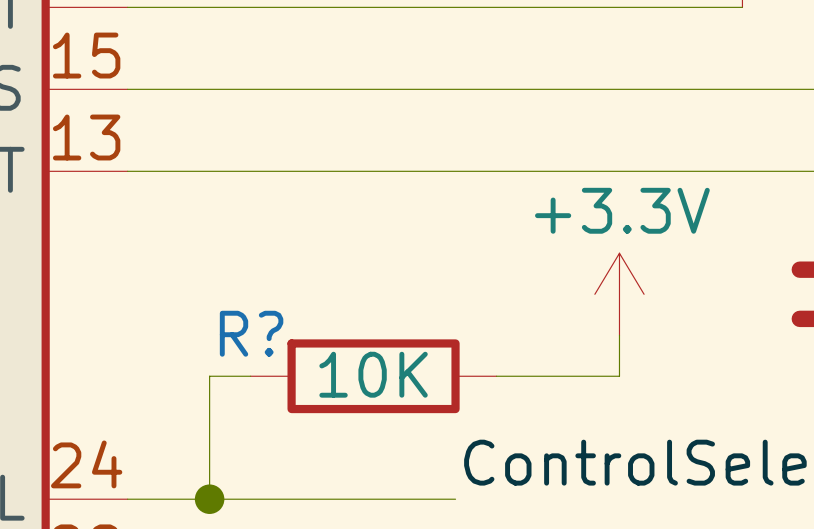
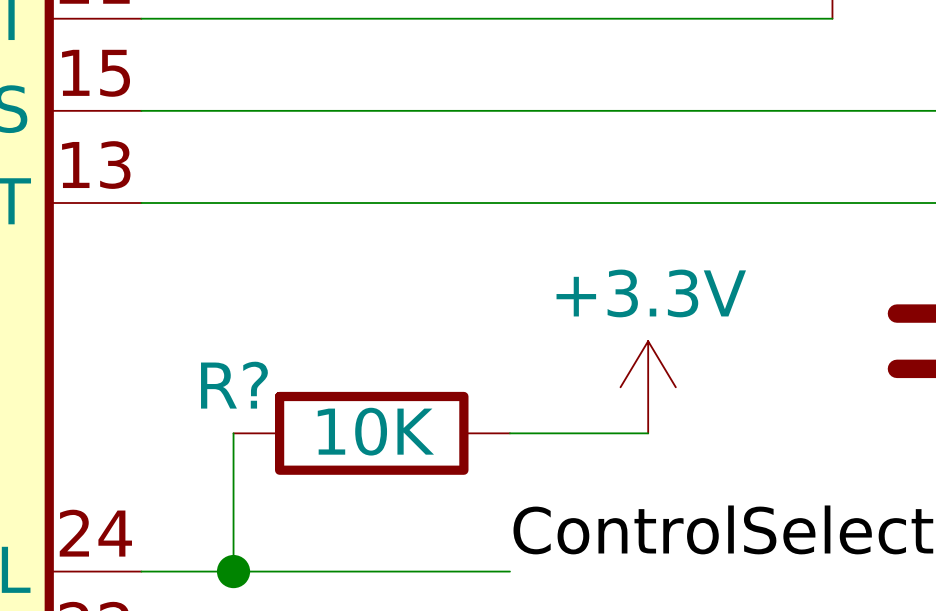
power symbol position: +3.3V (619, 294) -> +3.3V (648, 387)
wire: (619, 335) (619, 376) (578, 376) -> none
R? position: (373, 376) -> (371, 433)

